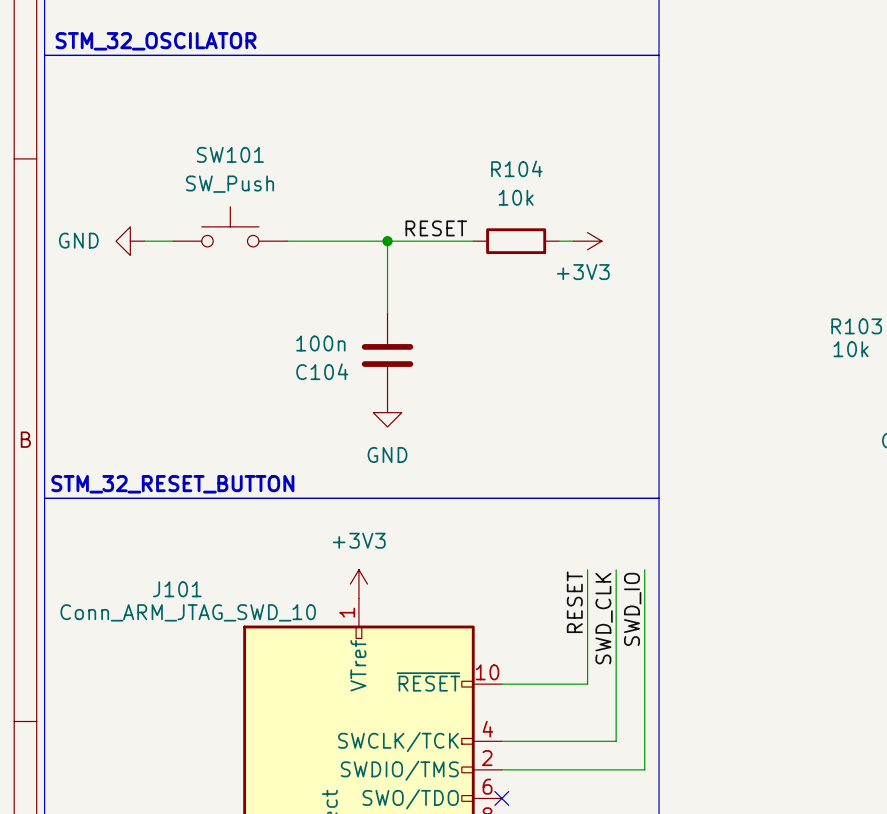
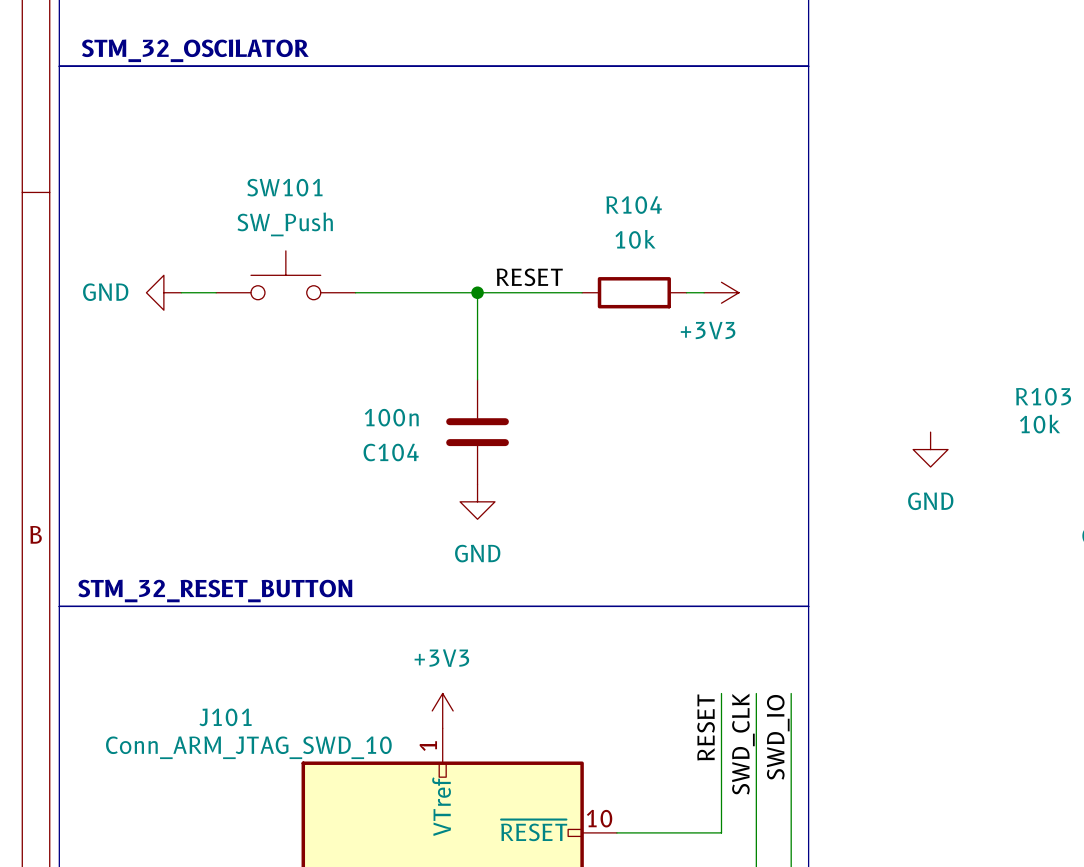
power symbol: none -> GND (930, 449)

